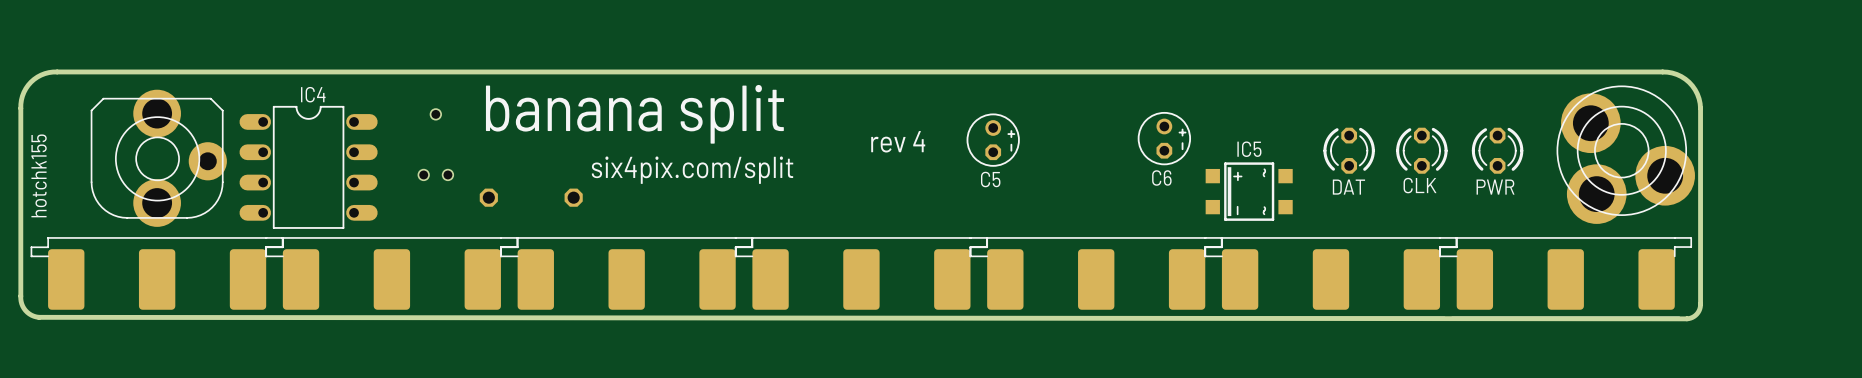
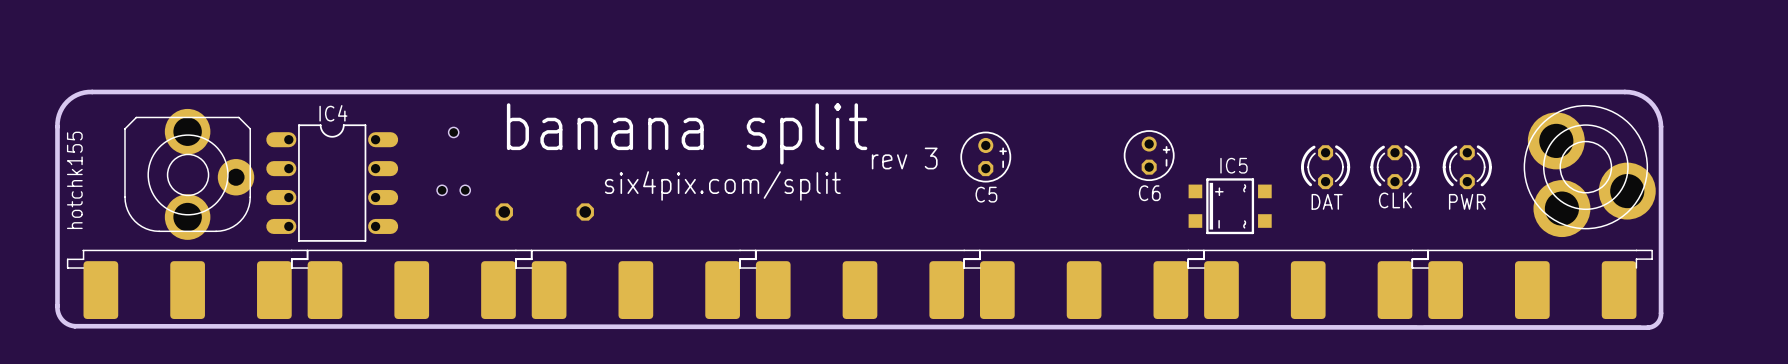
text: rev 4 (898, 141) -> rev 3 (904, 158)

